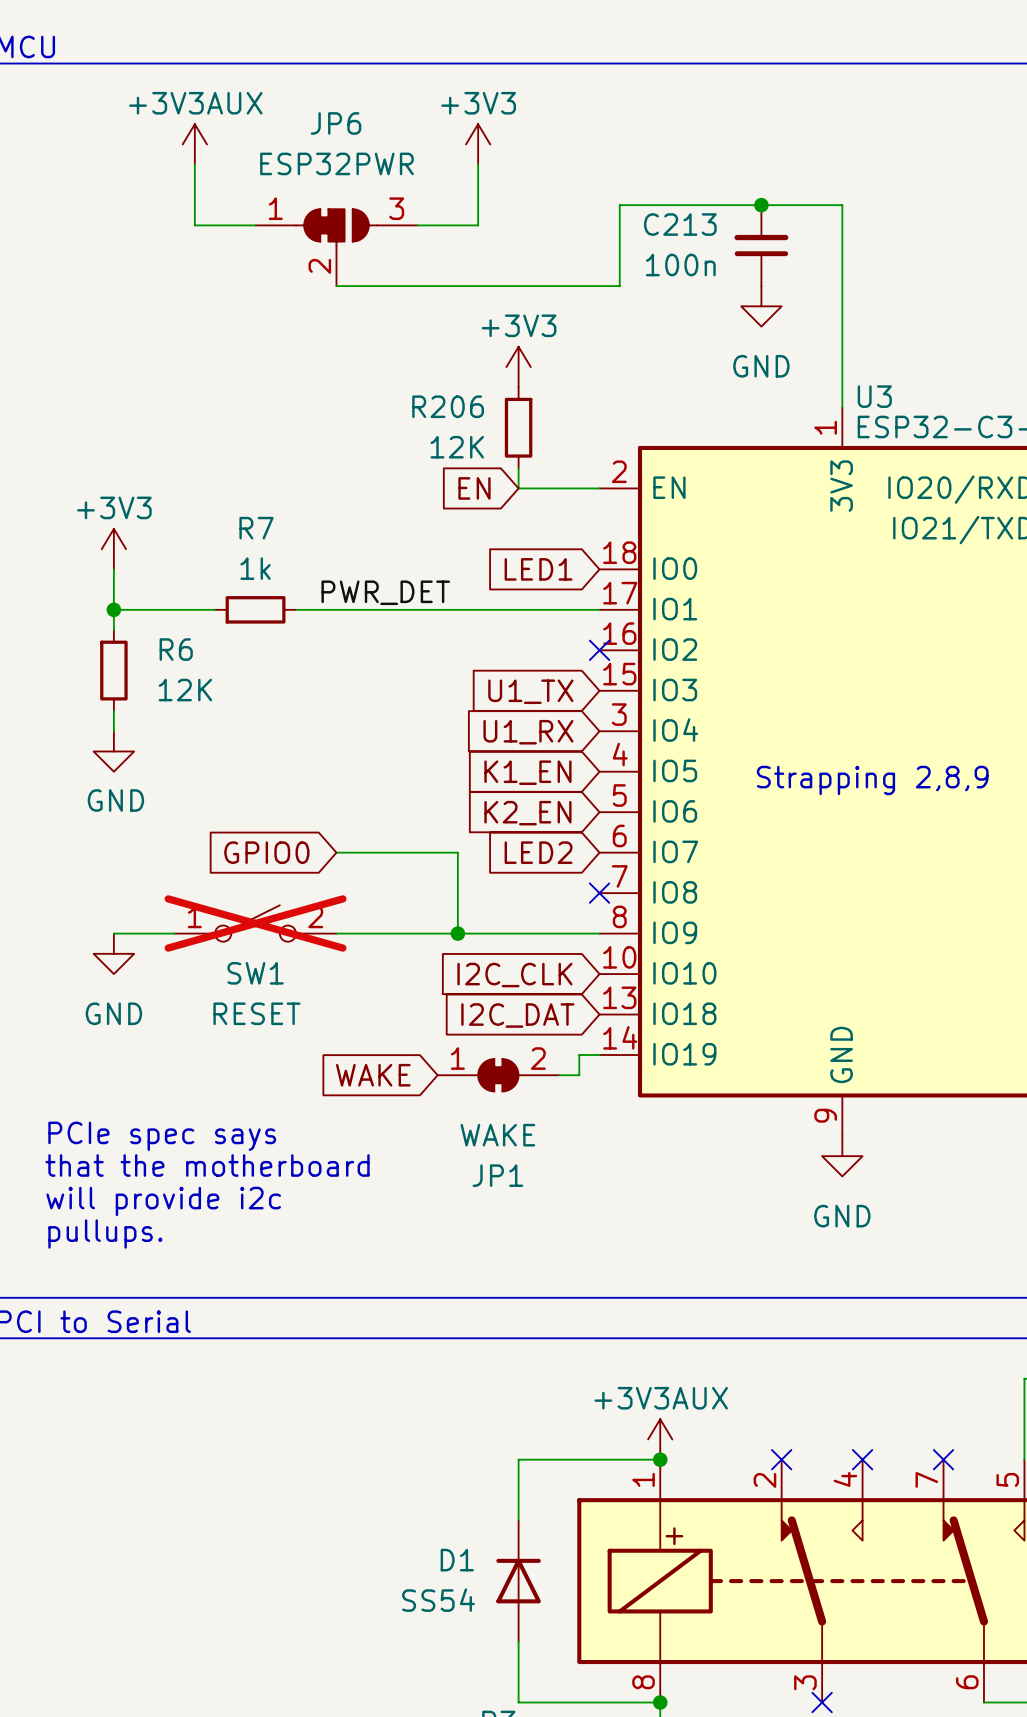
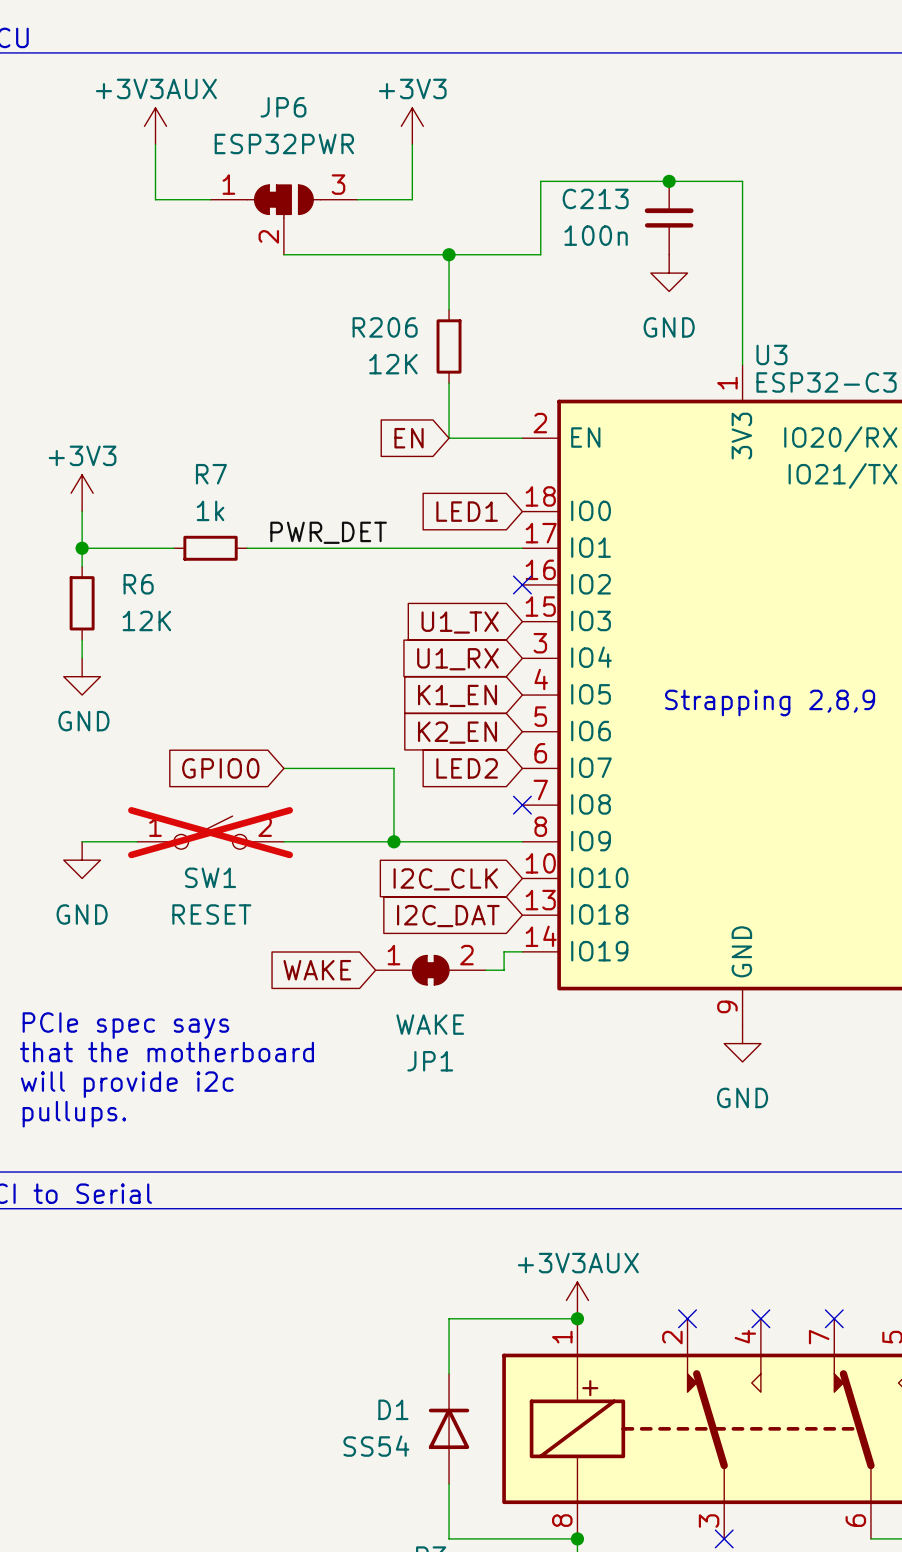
wire: none -> (449, 254) (449, 309)
junction: none -> (449, 254)
power symbol: +3V3 (518, 367) -> none
wire: none -> (449, 383) (449, 419)
R206 position: (518, 427) -> (449, 346)

